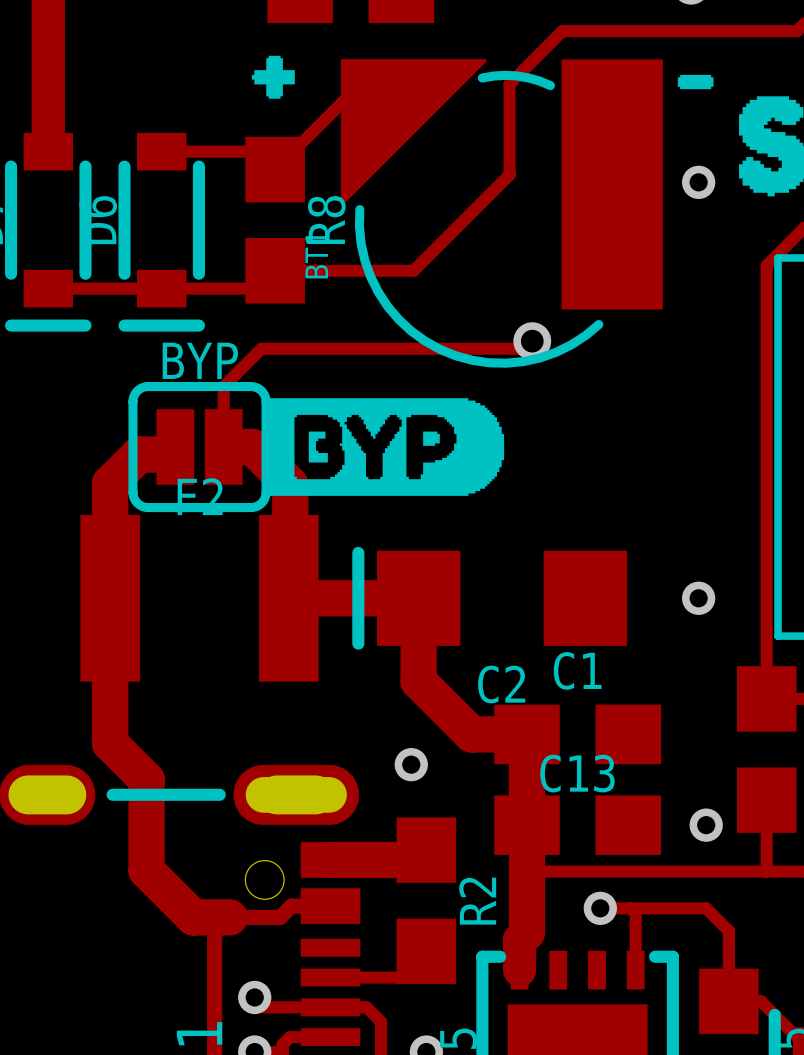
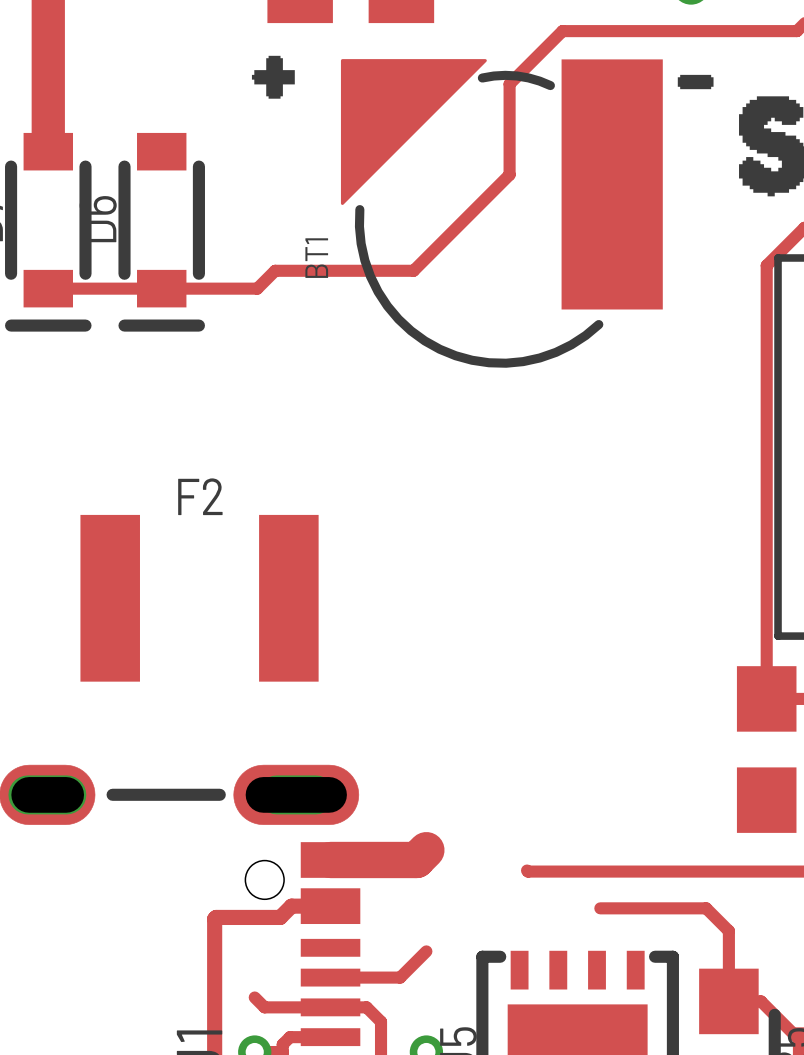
track: (381, 99) (344, 99) (275, 169) (257, 151) (161, 151) -> none
via: (698, 182) -> none
R8: (275, 220) -> none
track: (532, 341) (524, 348) (261, 348) (223, 386) (223, 447) (252, 447) (290, 484) (288, 598) (418, 598) (418, 681) (471, 734) (527, 734) (527, 932) (519, 939) (519, 970) -> none
via: (532, 341) -> none
drawing: [268, 398, 505, 496] -> none
track: (175, 447) (167, 454) (139, 454) (110, 483) (110, 743) (146, 779) (146, 870) (193, 917) (229, 917) -> none
BYP: (199, 447) -> none
C2: (489, 598) -> none
via: (698, 598) -> none
C1: (577, 734) -> none
via: (411, 764) -> none
track: (766, 800) (766, 871) -> none
C13: (577, 825) -> none
via: (706, 825) -> none
R2: (426, 900) -> none
via: (600, 908) -> none
track: (630, 908) (635, 913) (635, 970) -> none
via: (254, 997) -> none

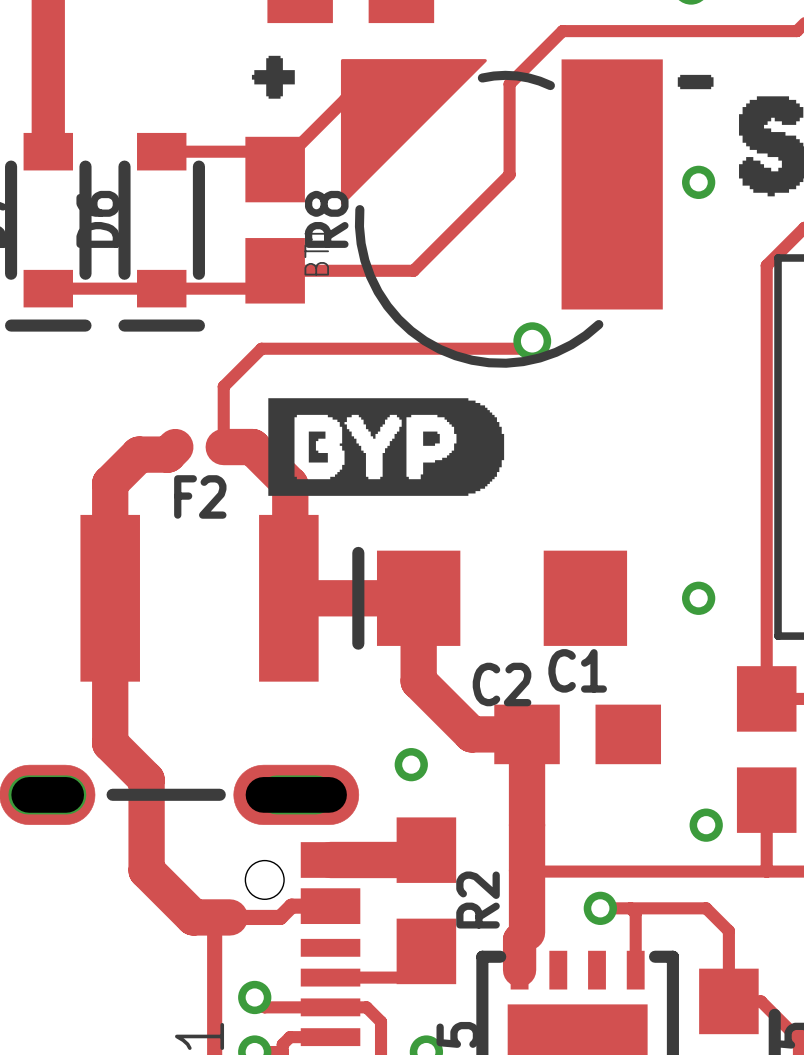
track: none -> (381, 99) (344, 99) (275, 169) (257, 151) (161, 151)
via: none -> (698, 182)
R8: none -> (275, 220)
track: none -> (532, 341) (524, 348) (261, 348) (223, 386) (223, 447) (252, 447) (290, 484) (288, 598) (418, 598) (418, 681) (471, 734) (527, 734) (527, 932) (519, 939) (519, 970)
via: none -> (532, 341)
drawing: none -> [268, 398, 505, 496]
track: none -> (175, 447) (167, 454) (139, 454) (110, 483) (110, 743) (146, 779) (146, 870) (193, 917) (229, 917)
C2: none -> (489, 598)
via: none -> (698, 598)
C1: none -> (577, 734)
via: none -> (411, 764)
track: none -> (766, 800) (766, 871)
via: none -> (706, 825)
R2: none -> (426, 900)
via: none -> (600, 908)
track: none -> (630, 908) (635, 913) (635, 970)
via: none -> (254, 997)

